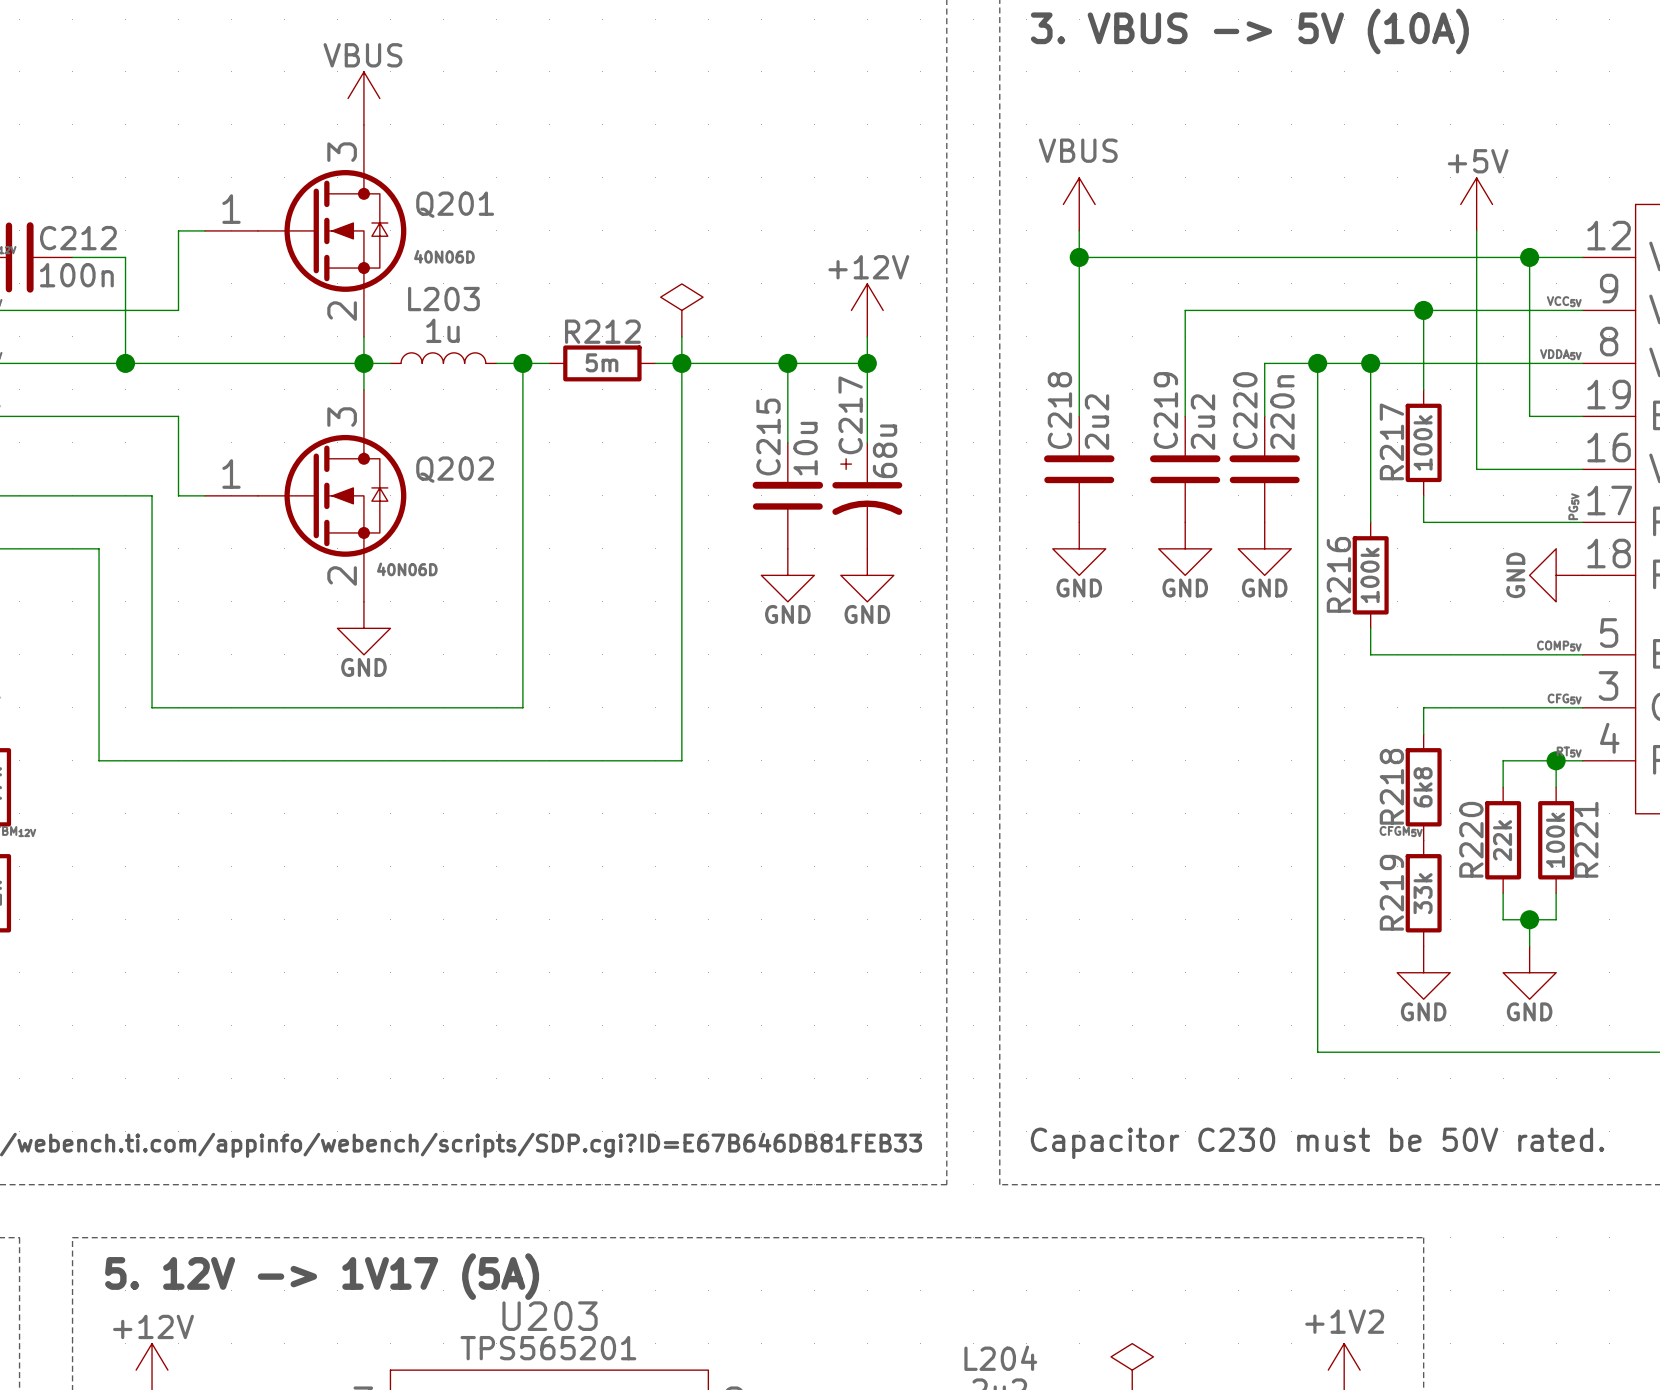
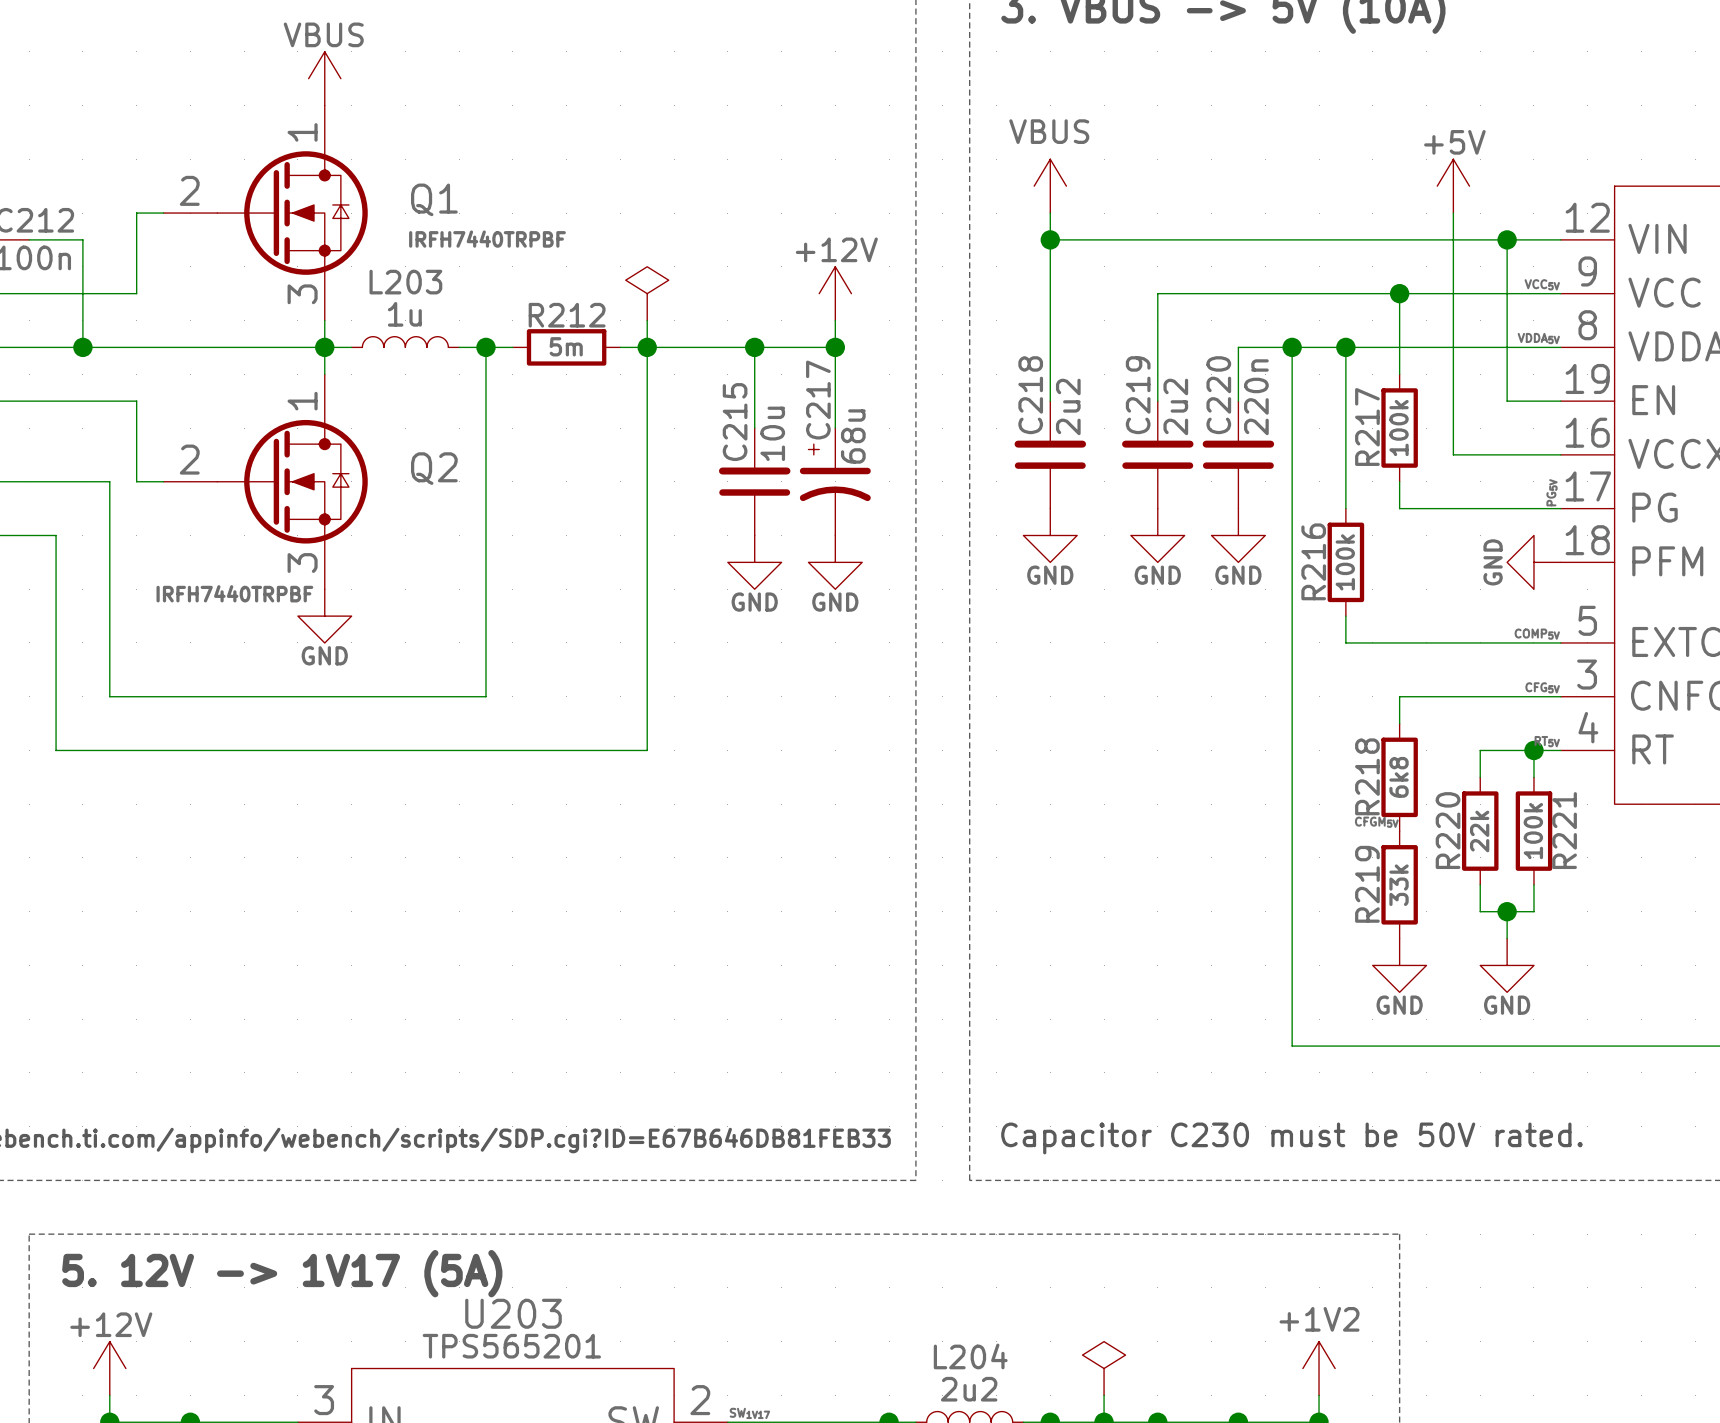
Q201 pin number: 3 (342, 152) -> 1 (302, 132)
Q201 name: Q201 (455, 204) -> Q1 (434, 199)
Q201 pin number: 1 (231, 209) -> 2 (189, 190)
Q201 value: 40N06D (444, 256) -> IRFH7440TRPBF (487, 239)
Q201 pin number: 2 (342, 311) -> 3 (302, 294)
Q202 pin number: 3 (342, 417) -> 1 (302, 401)
Q202 name: Q202 (455, 469) -> Q2 (434, 468)
Q202 pin number: 1 (231, 474) -> 2 (189, 459)
Q202 value: 40N06D (407, 569) -> IRFH7440TRPBF (234, 593)
Q202 pin number: 2 (342, 575) -> 3 (302, 563)

